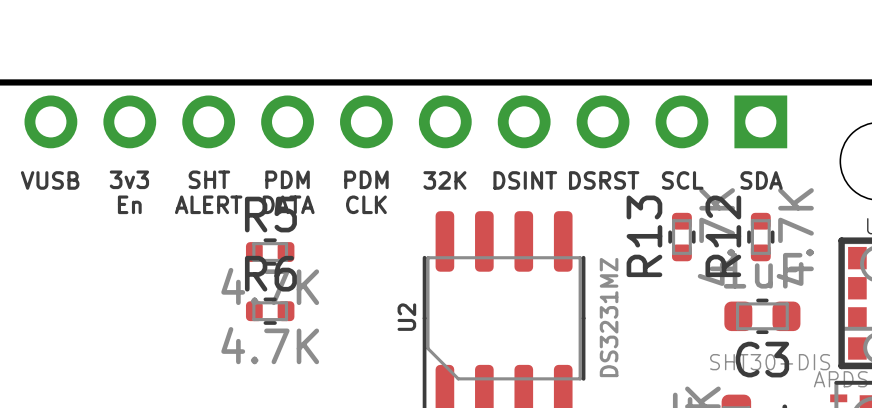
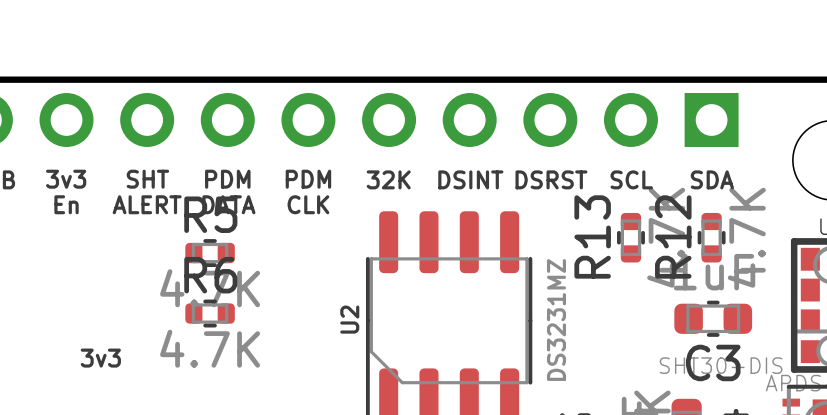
text: none -> 3v3 (100, 358)

